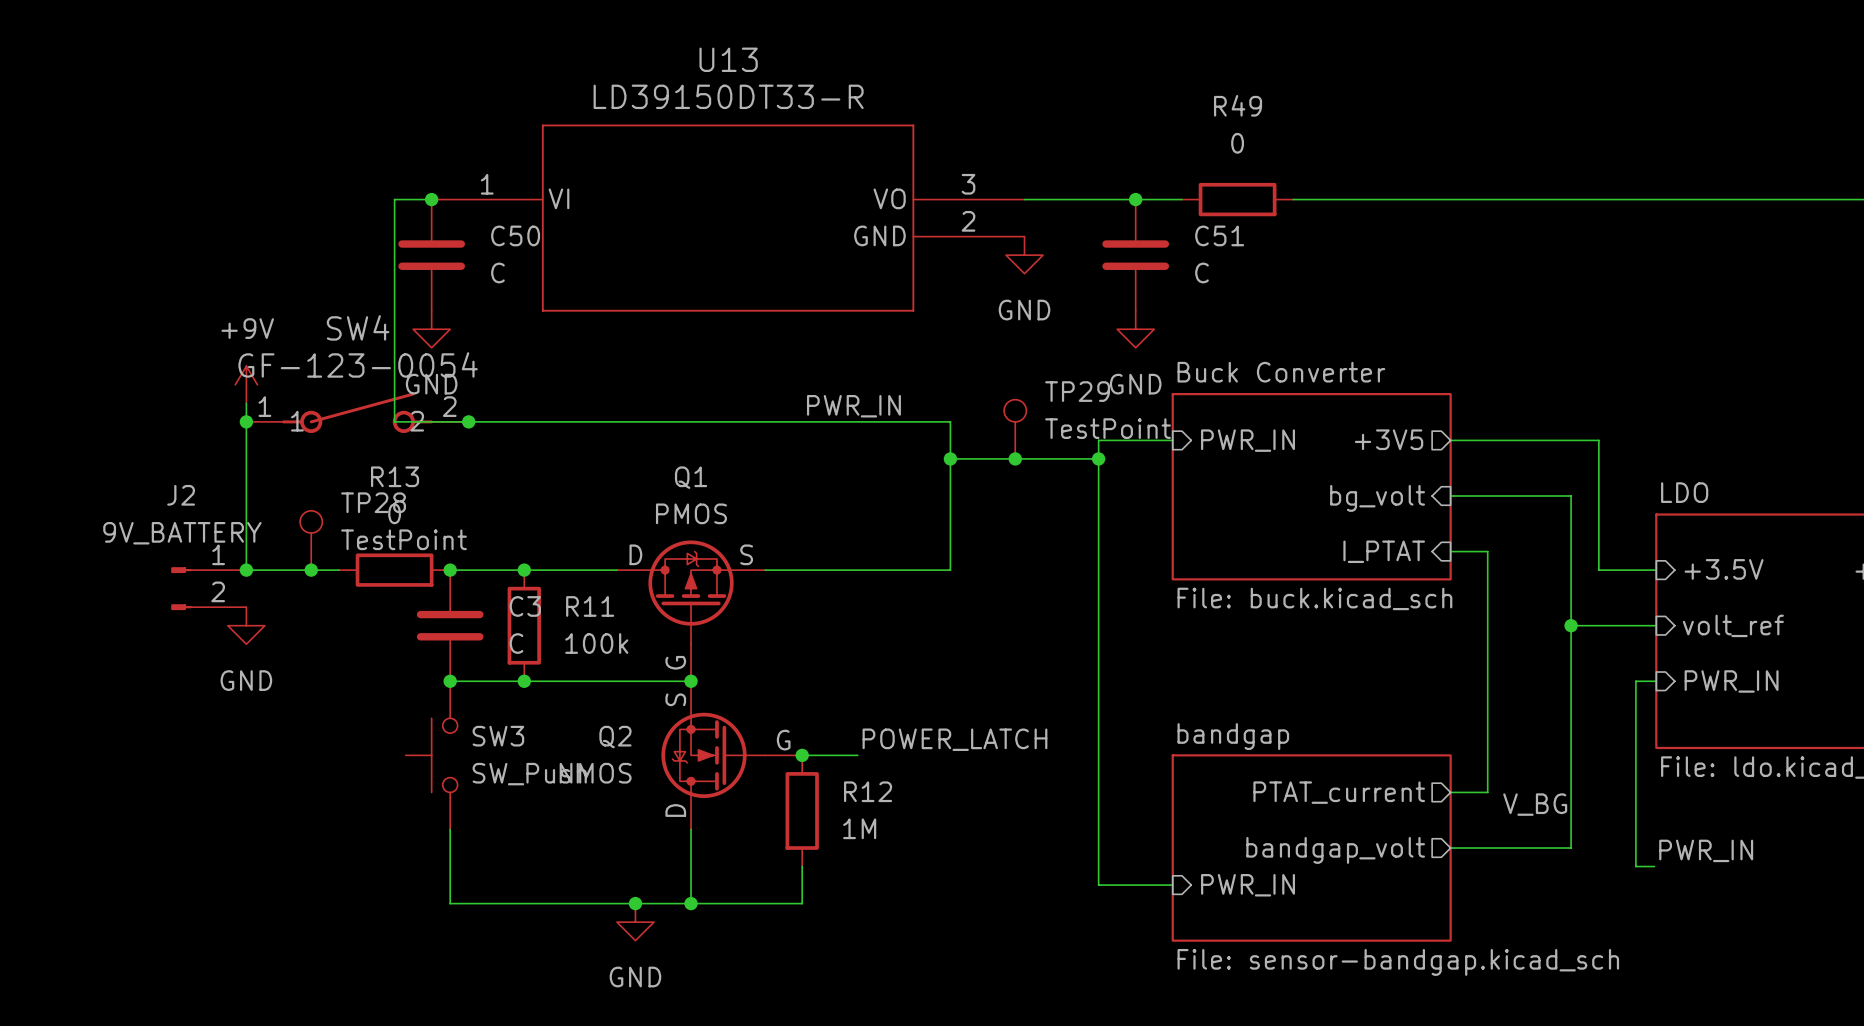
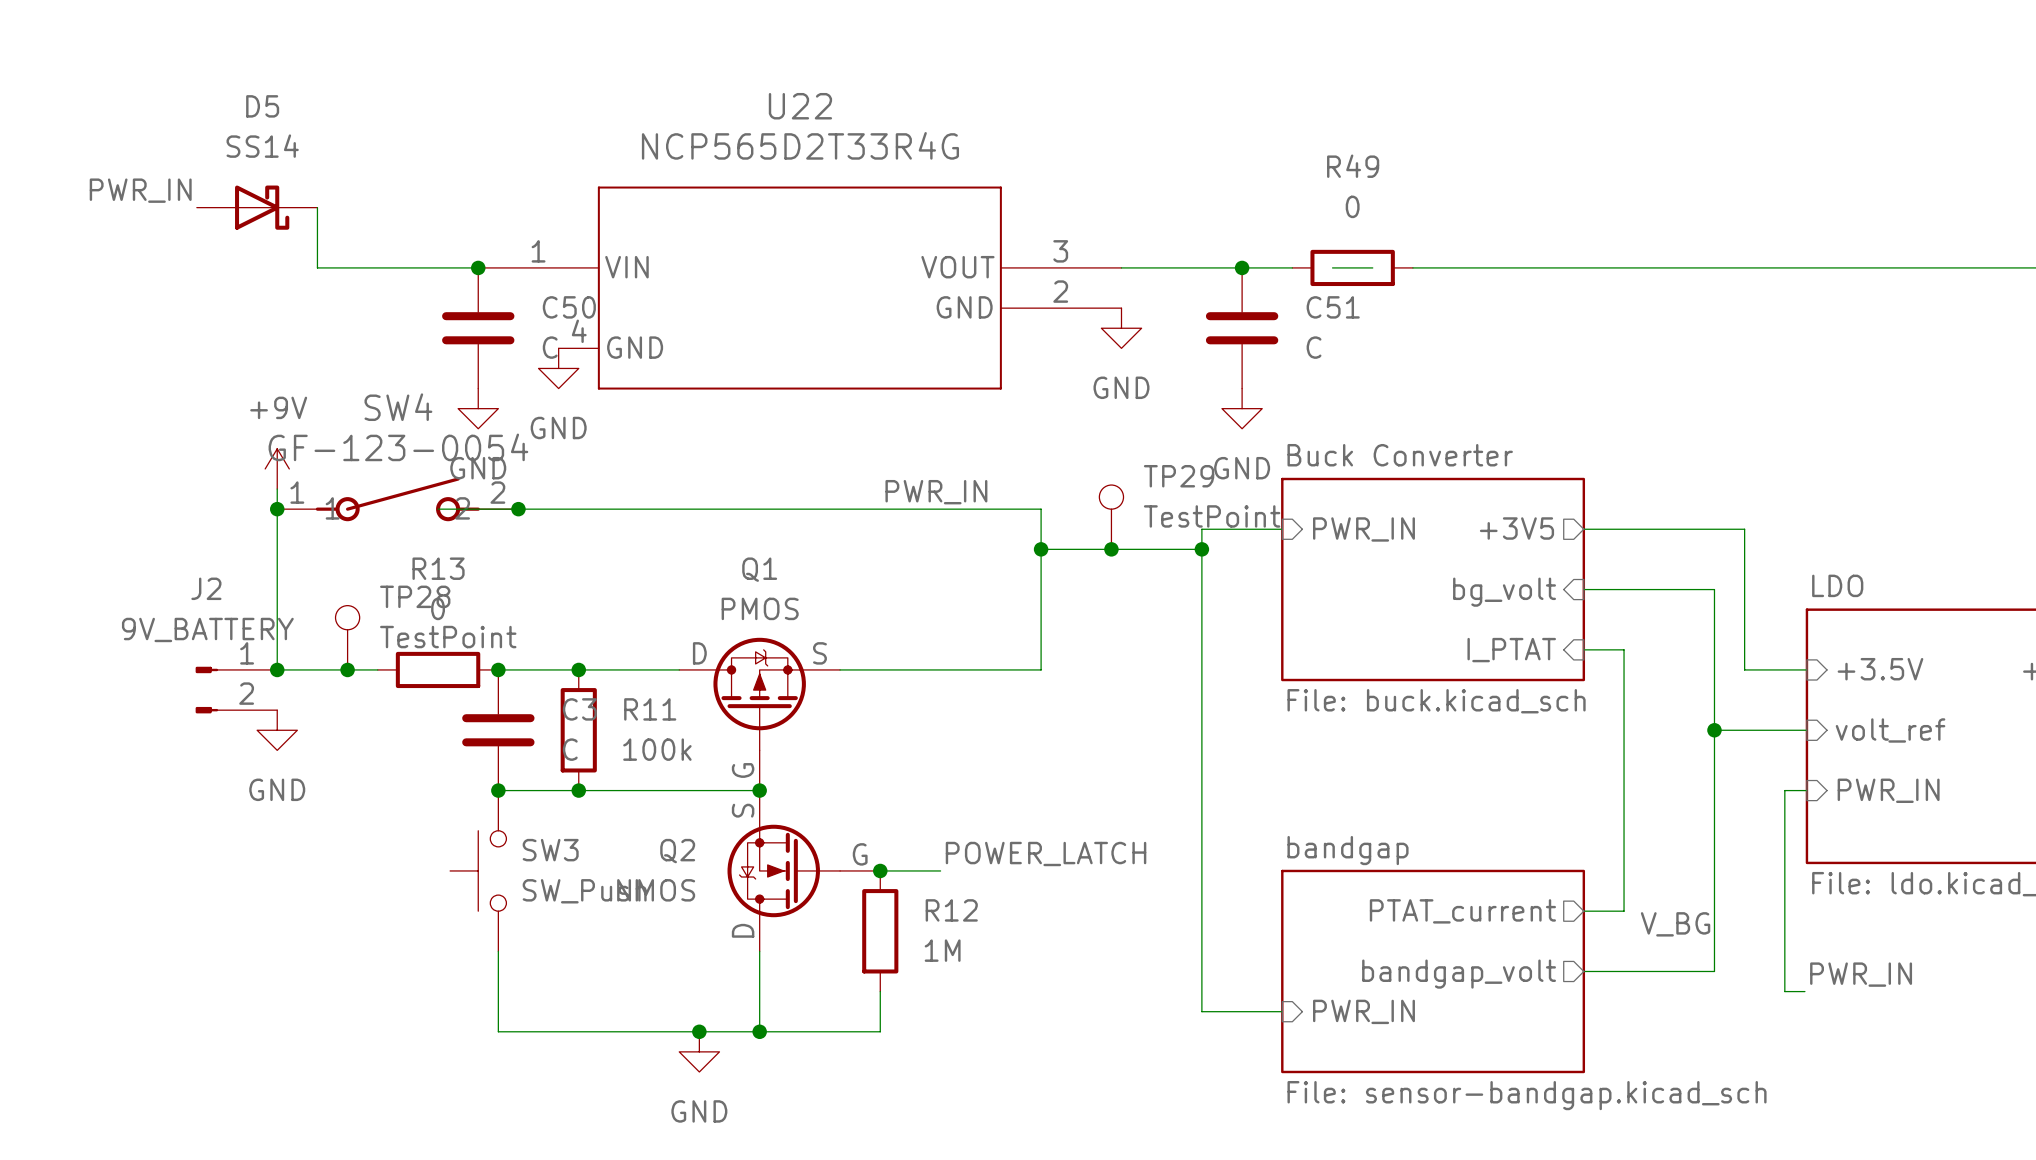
label: none -> PWR_IN (140, 190)
D5: none -> SS14 (257, 207)
wire: (394, 199) (394, 421) -> (438, 267) (317, 267) (317, 207)
wire: none -> (1332, 267) (1372, 267)
U13: LD39150DT33-R (728, 218) -> none
U22: none -> NCP565D2T33R4G (799, 288)
power symbol: none -> GND (558, 368)

